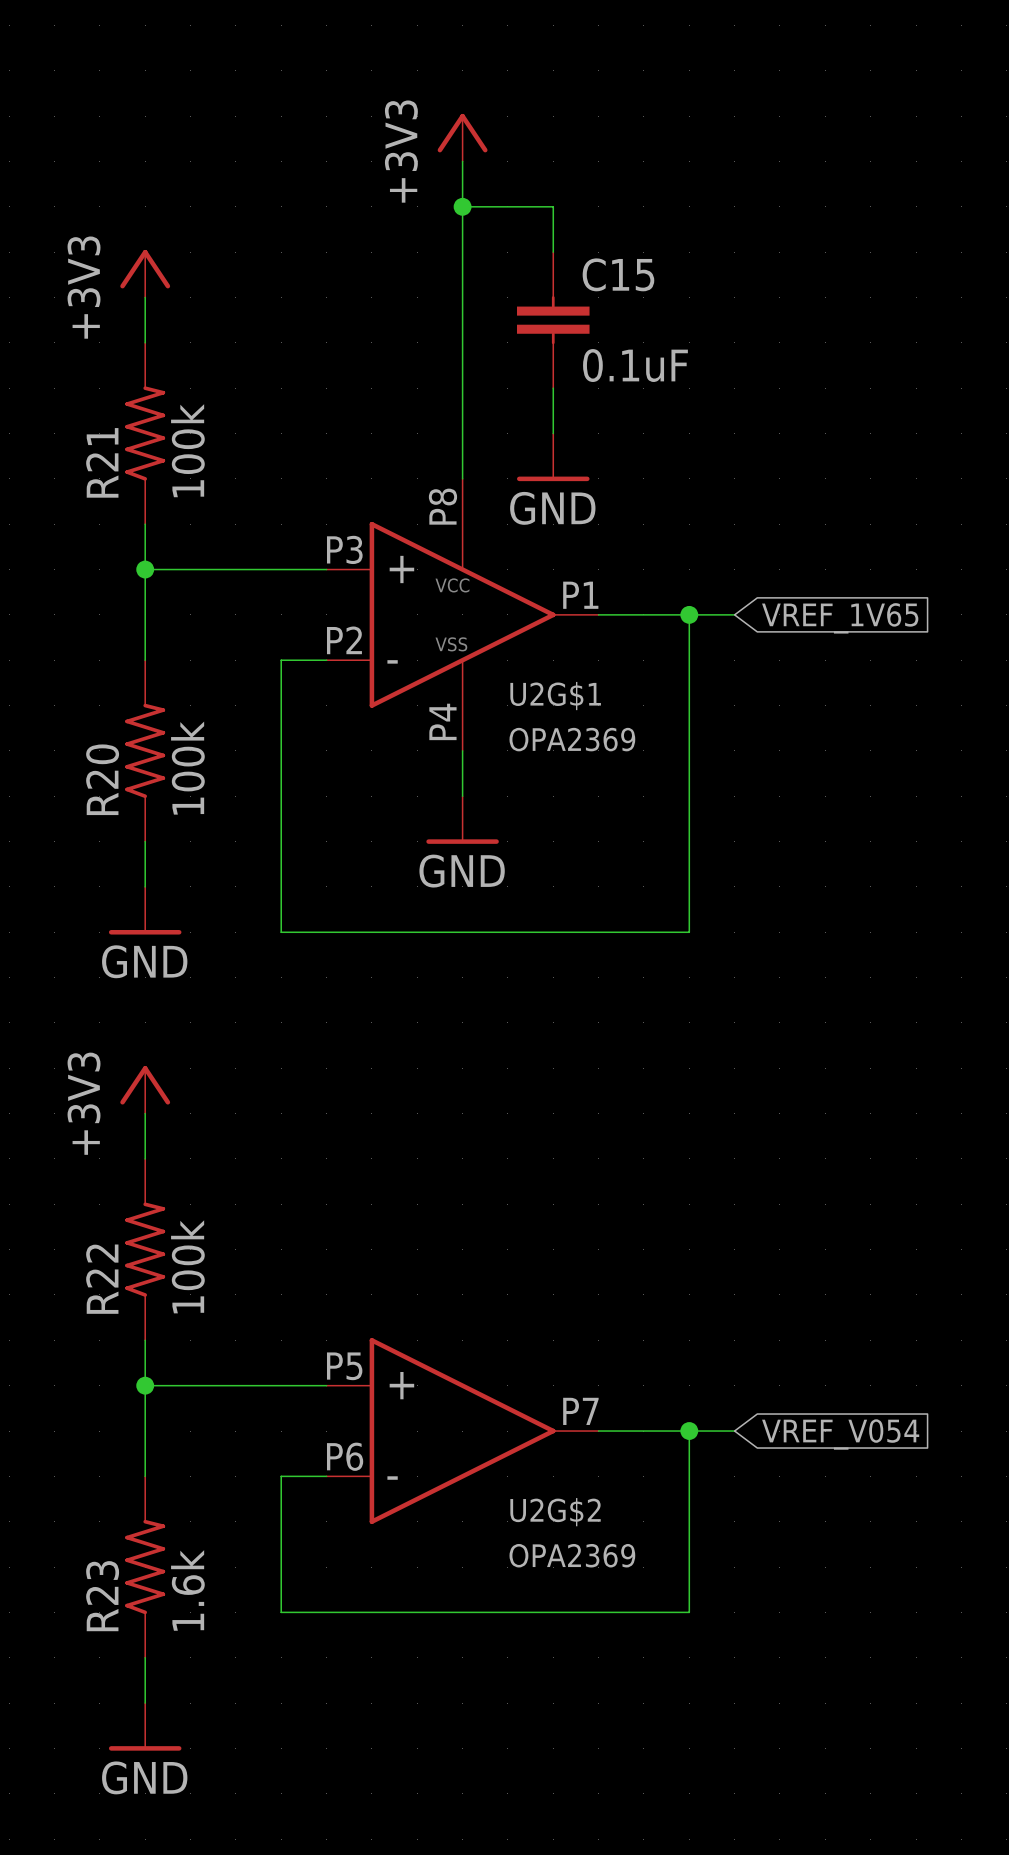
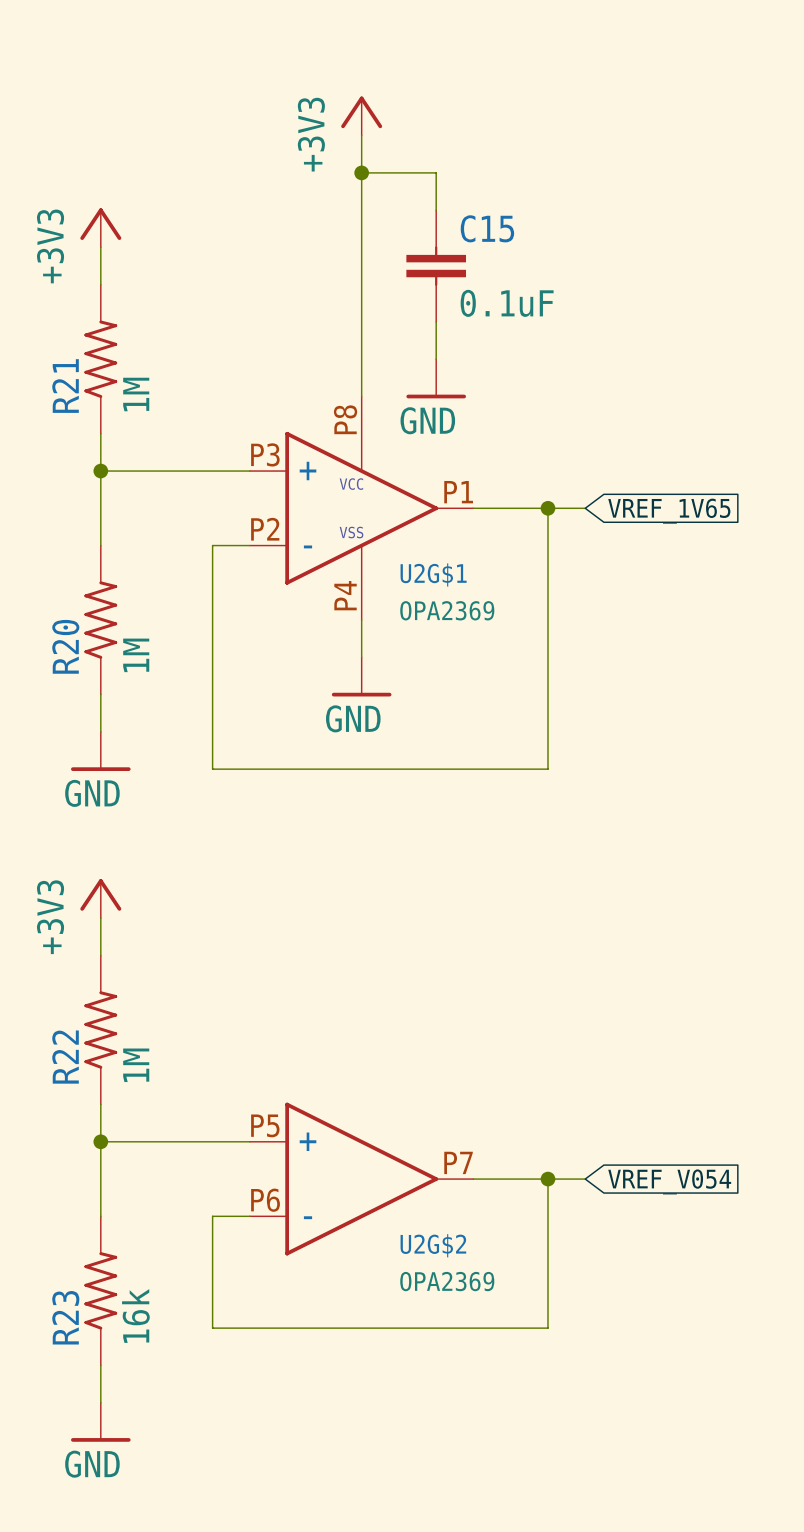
R21 value: 100k (187, 450) -> 1M (136, 394)
R20 value: 100k (187, 768) -> 1M (136, 655)
R22 value: 100k (187, 1266) -> 1M (136, 1065)
R23 value: 1.6k (187, 1590) -> 16k (135, 1315)

